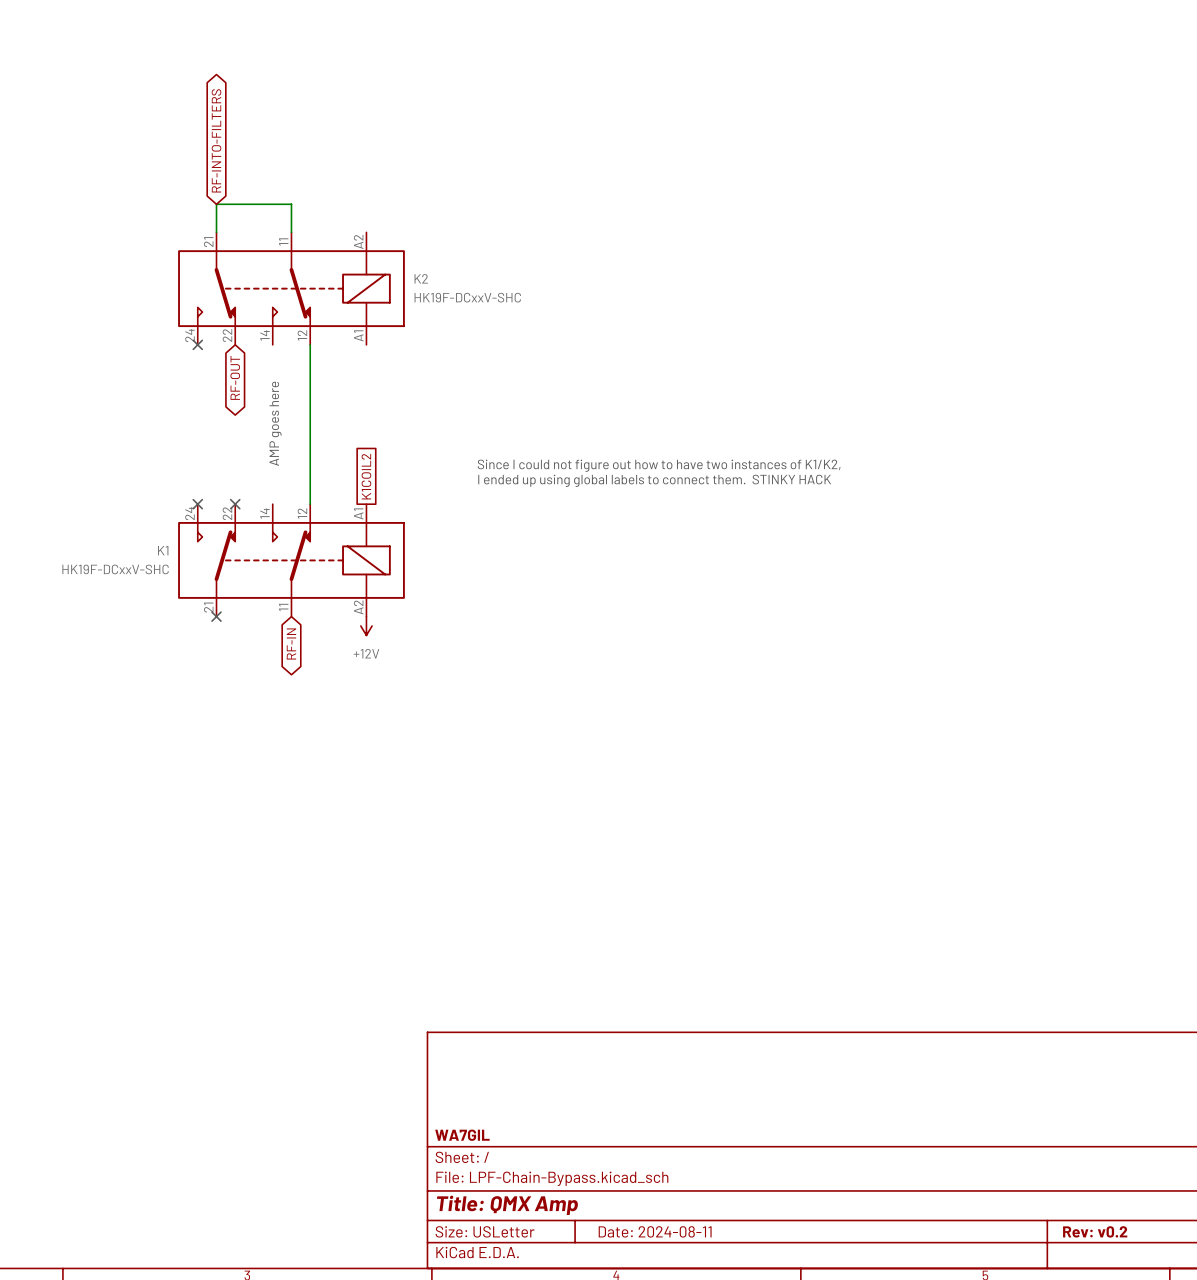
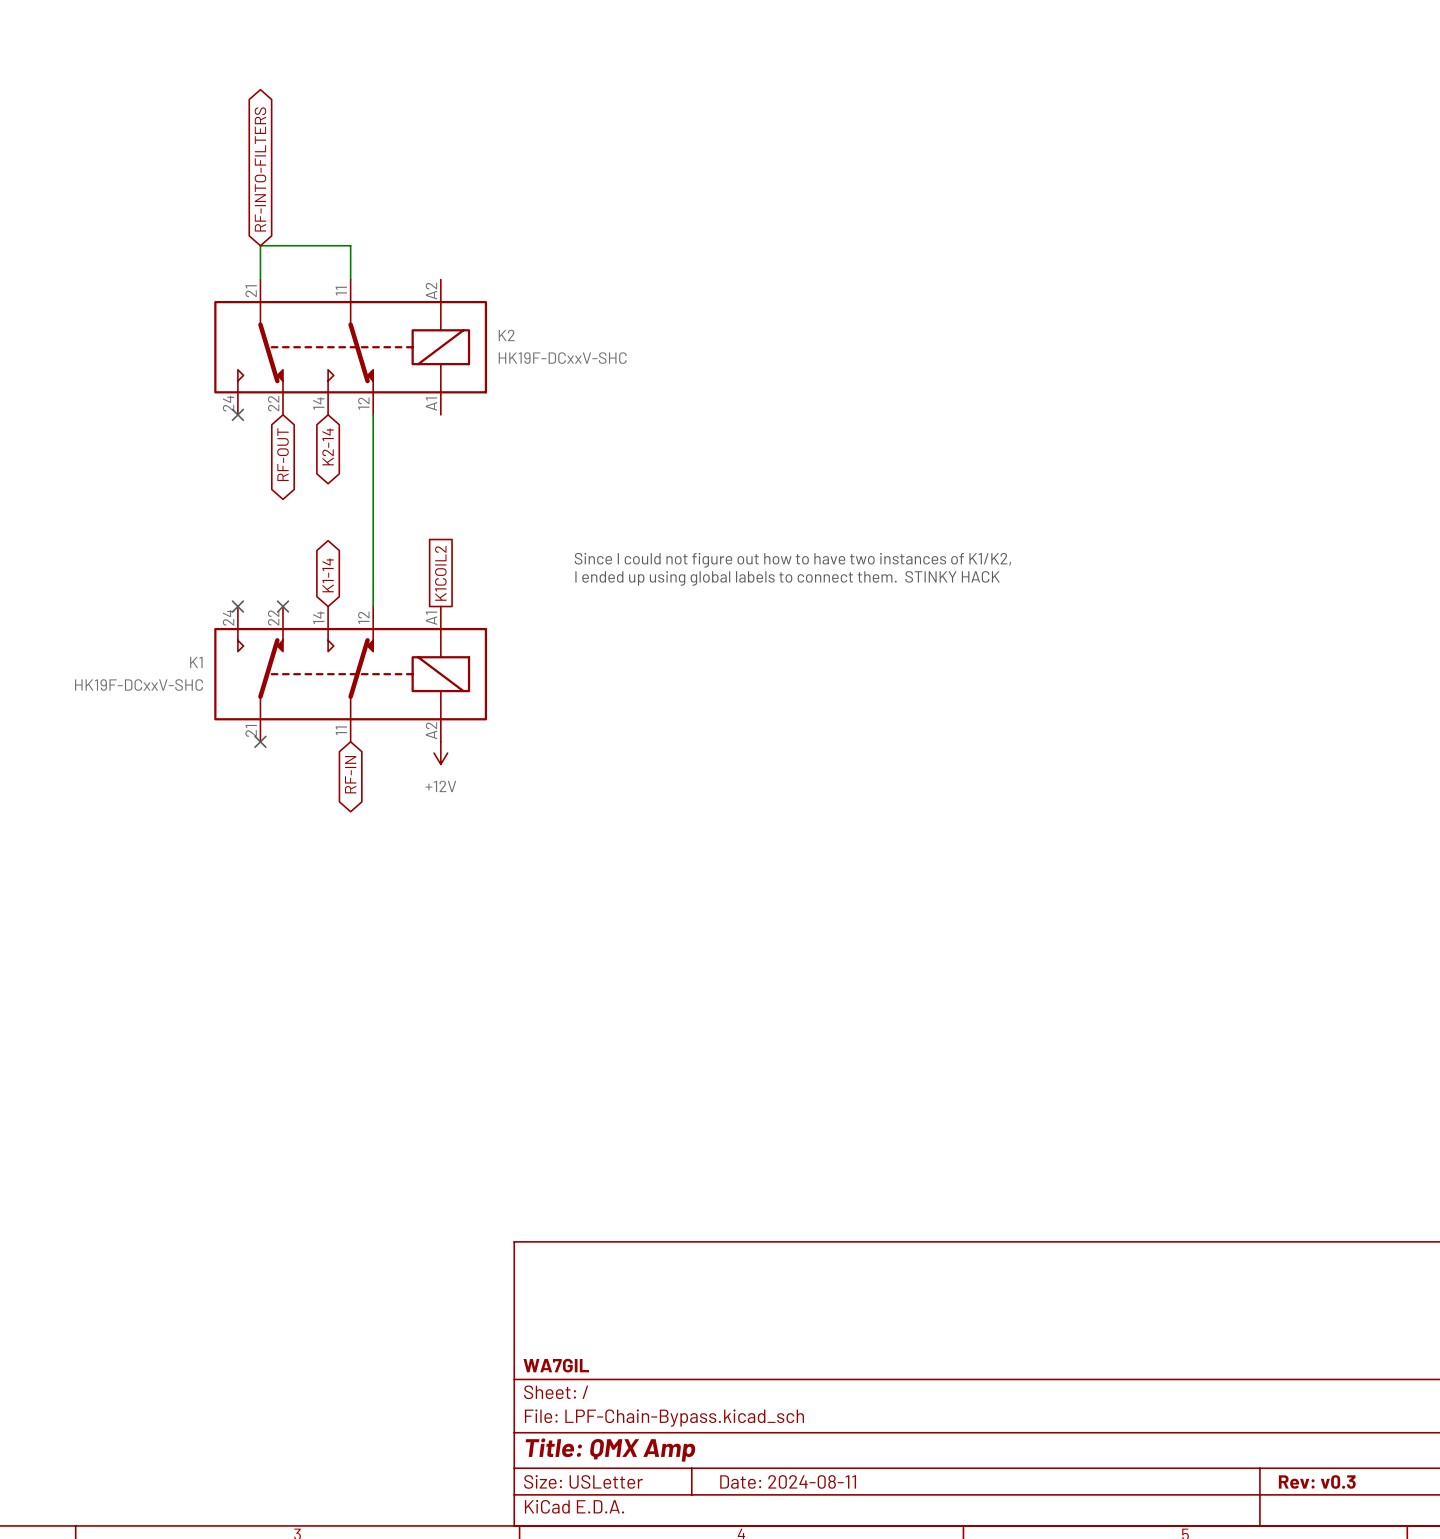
global label: none -> K2-14 (328, 446)
text: AMP goes here (275, 423) -> none
global label: none -> K1-14 (328, 575)
title block: Rev: v0.2 (1095, 1231) -> Rev: v0.3 (1317, 1481)

